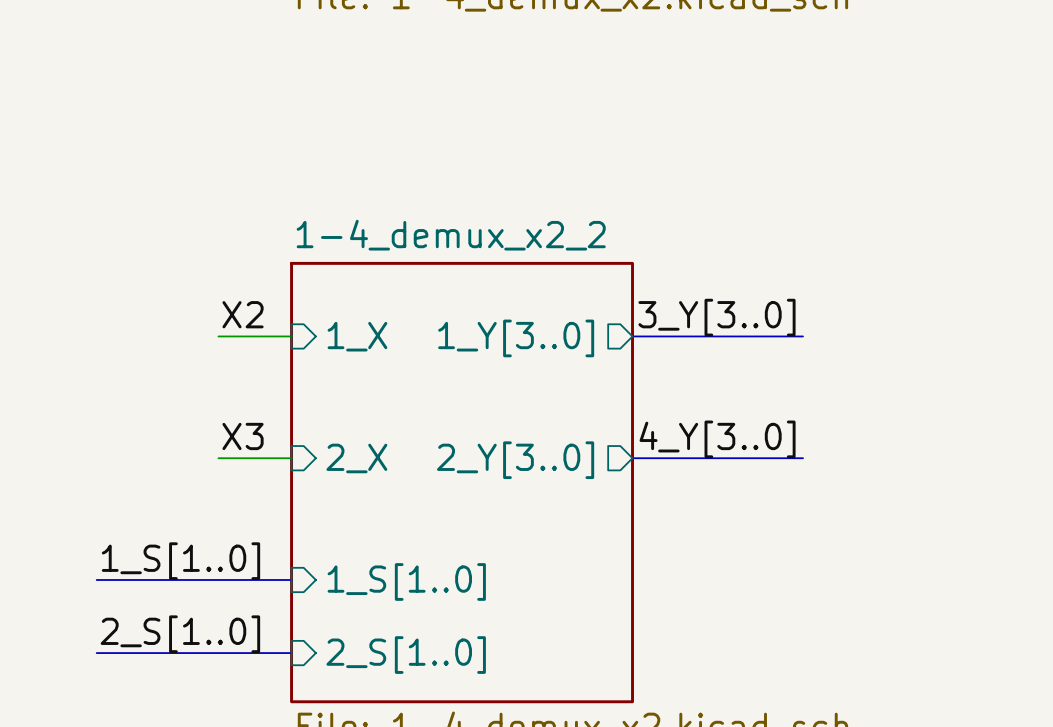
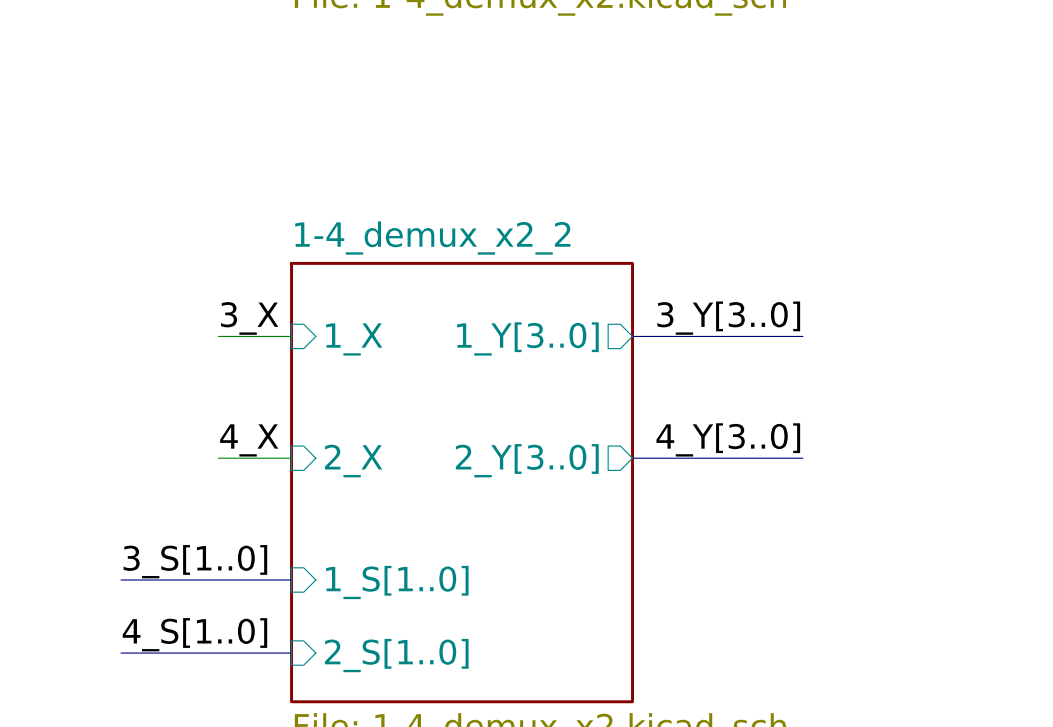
label: X2 (243, 314) -> 3_X (249, 318)
label: X3 (243, 436) -> 4_X (249, 440)
label: 1_S[1..0] (180, 561) -> 3_S[1..0] (195, 561)
bus: (96, 579) (121, 579) -> none
label: 2_S[1..0] (180, 634) -> 4_S[1..0] (194, 634)
bus: (96, 653) (121, 653) -> none

